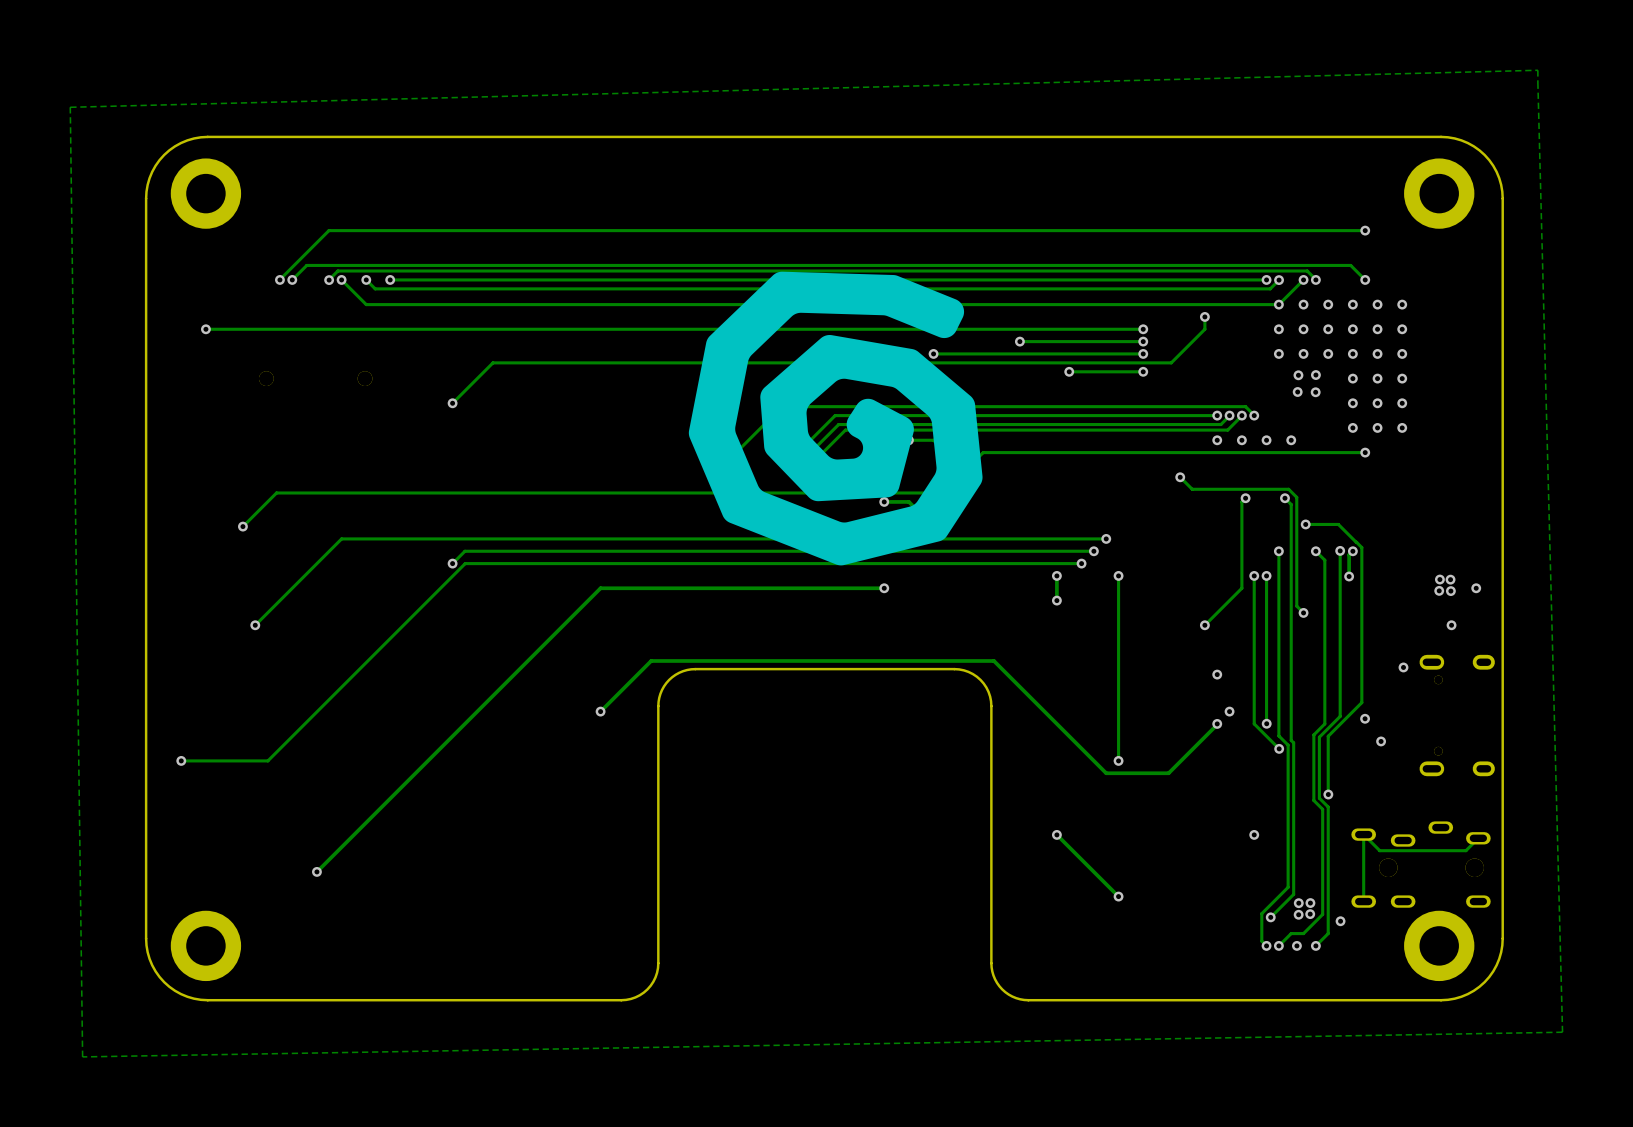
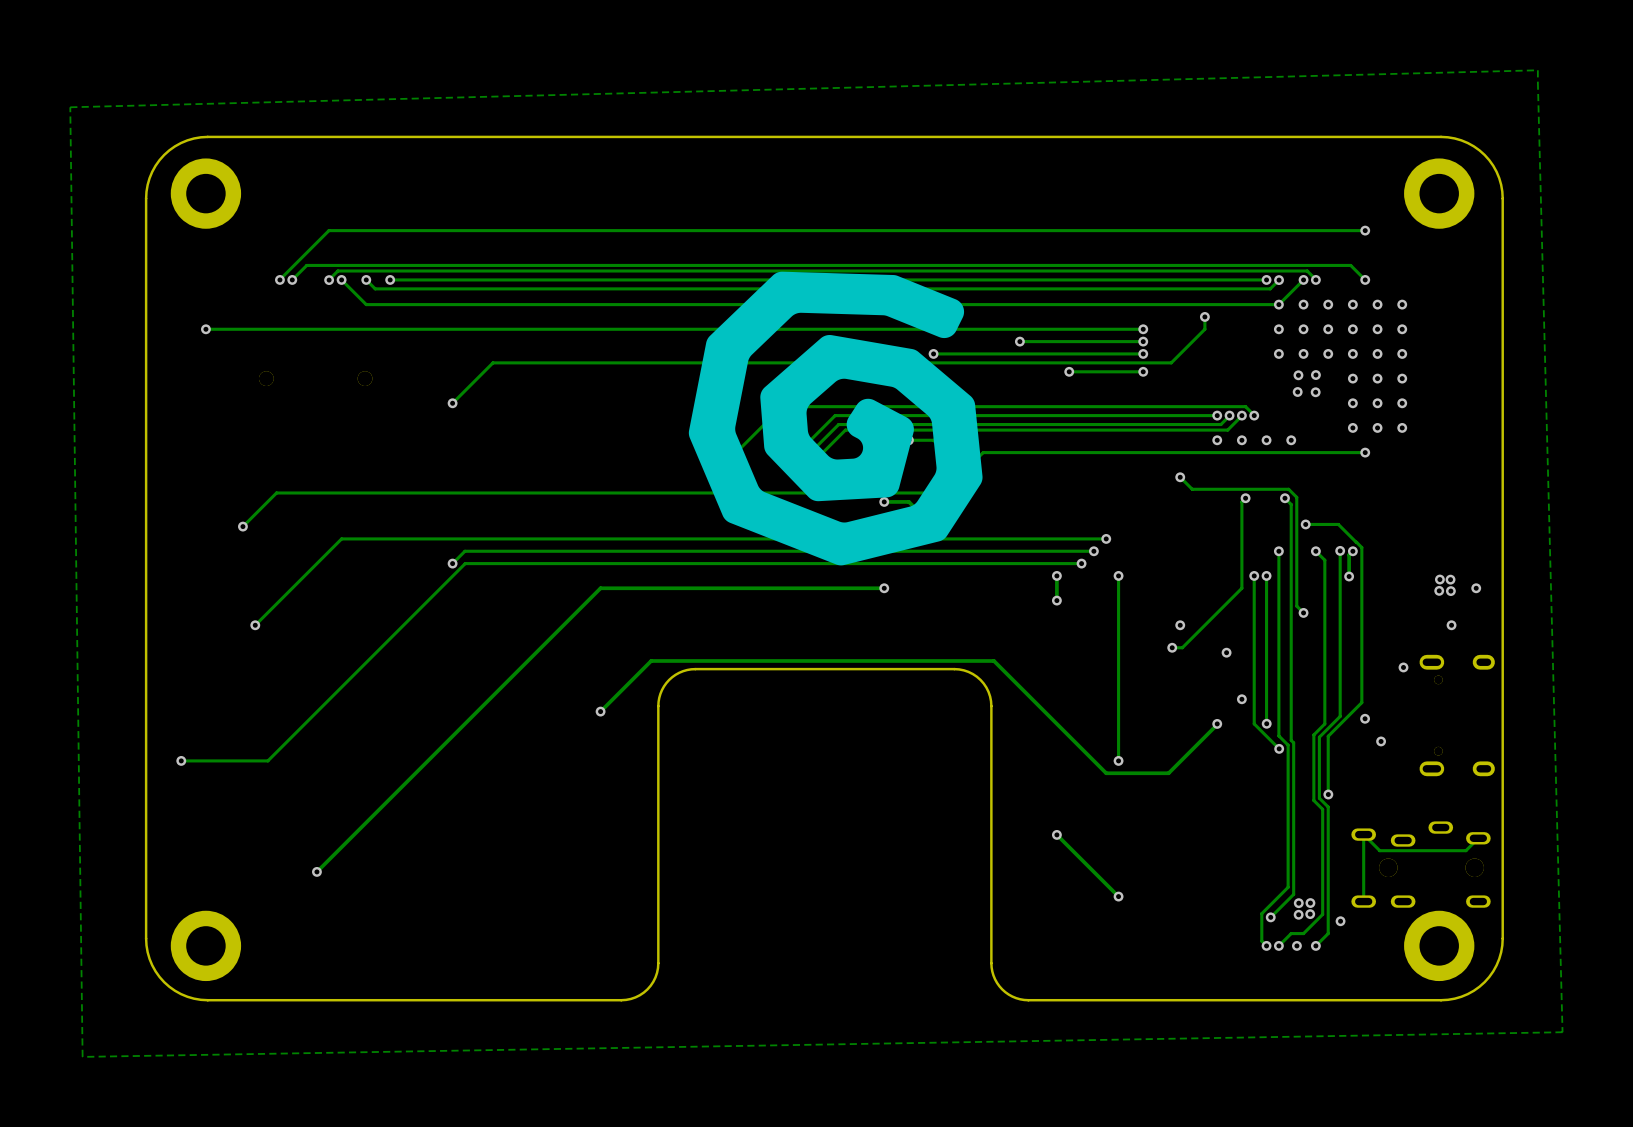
via: none -> (1180, 625)
track: none -> (1204, 625) (1182, 647) (1172, 647)
via: (1204, 625) -> none
via: none -> (1172, 647)
via: none -> (1226, 652)
via: (1217, 674) -> none
via: none -> (1241, 699)
via: (1229, 711) -> none
via: (1254, 834) -> none

